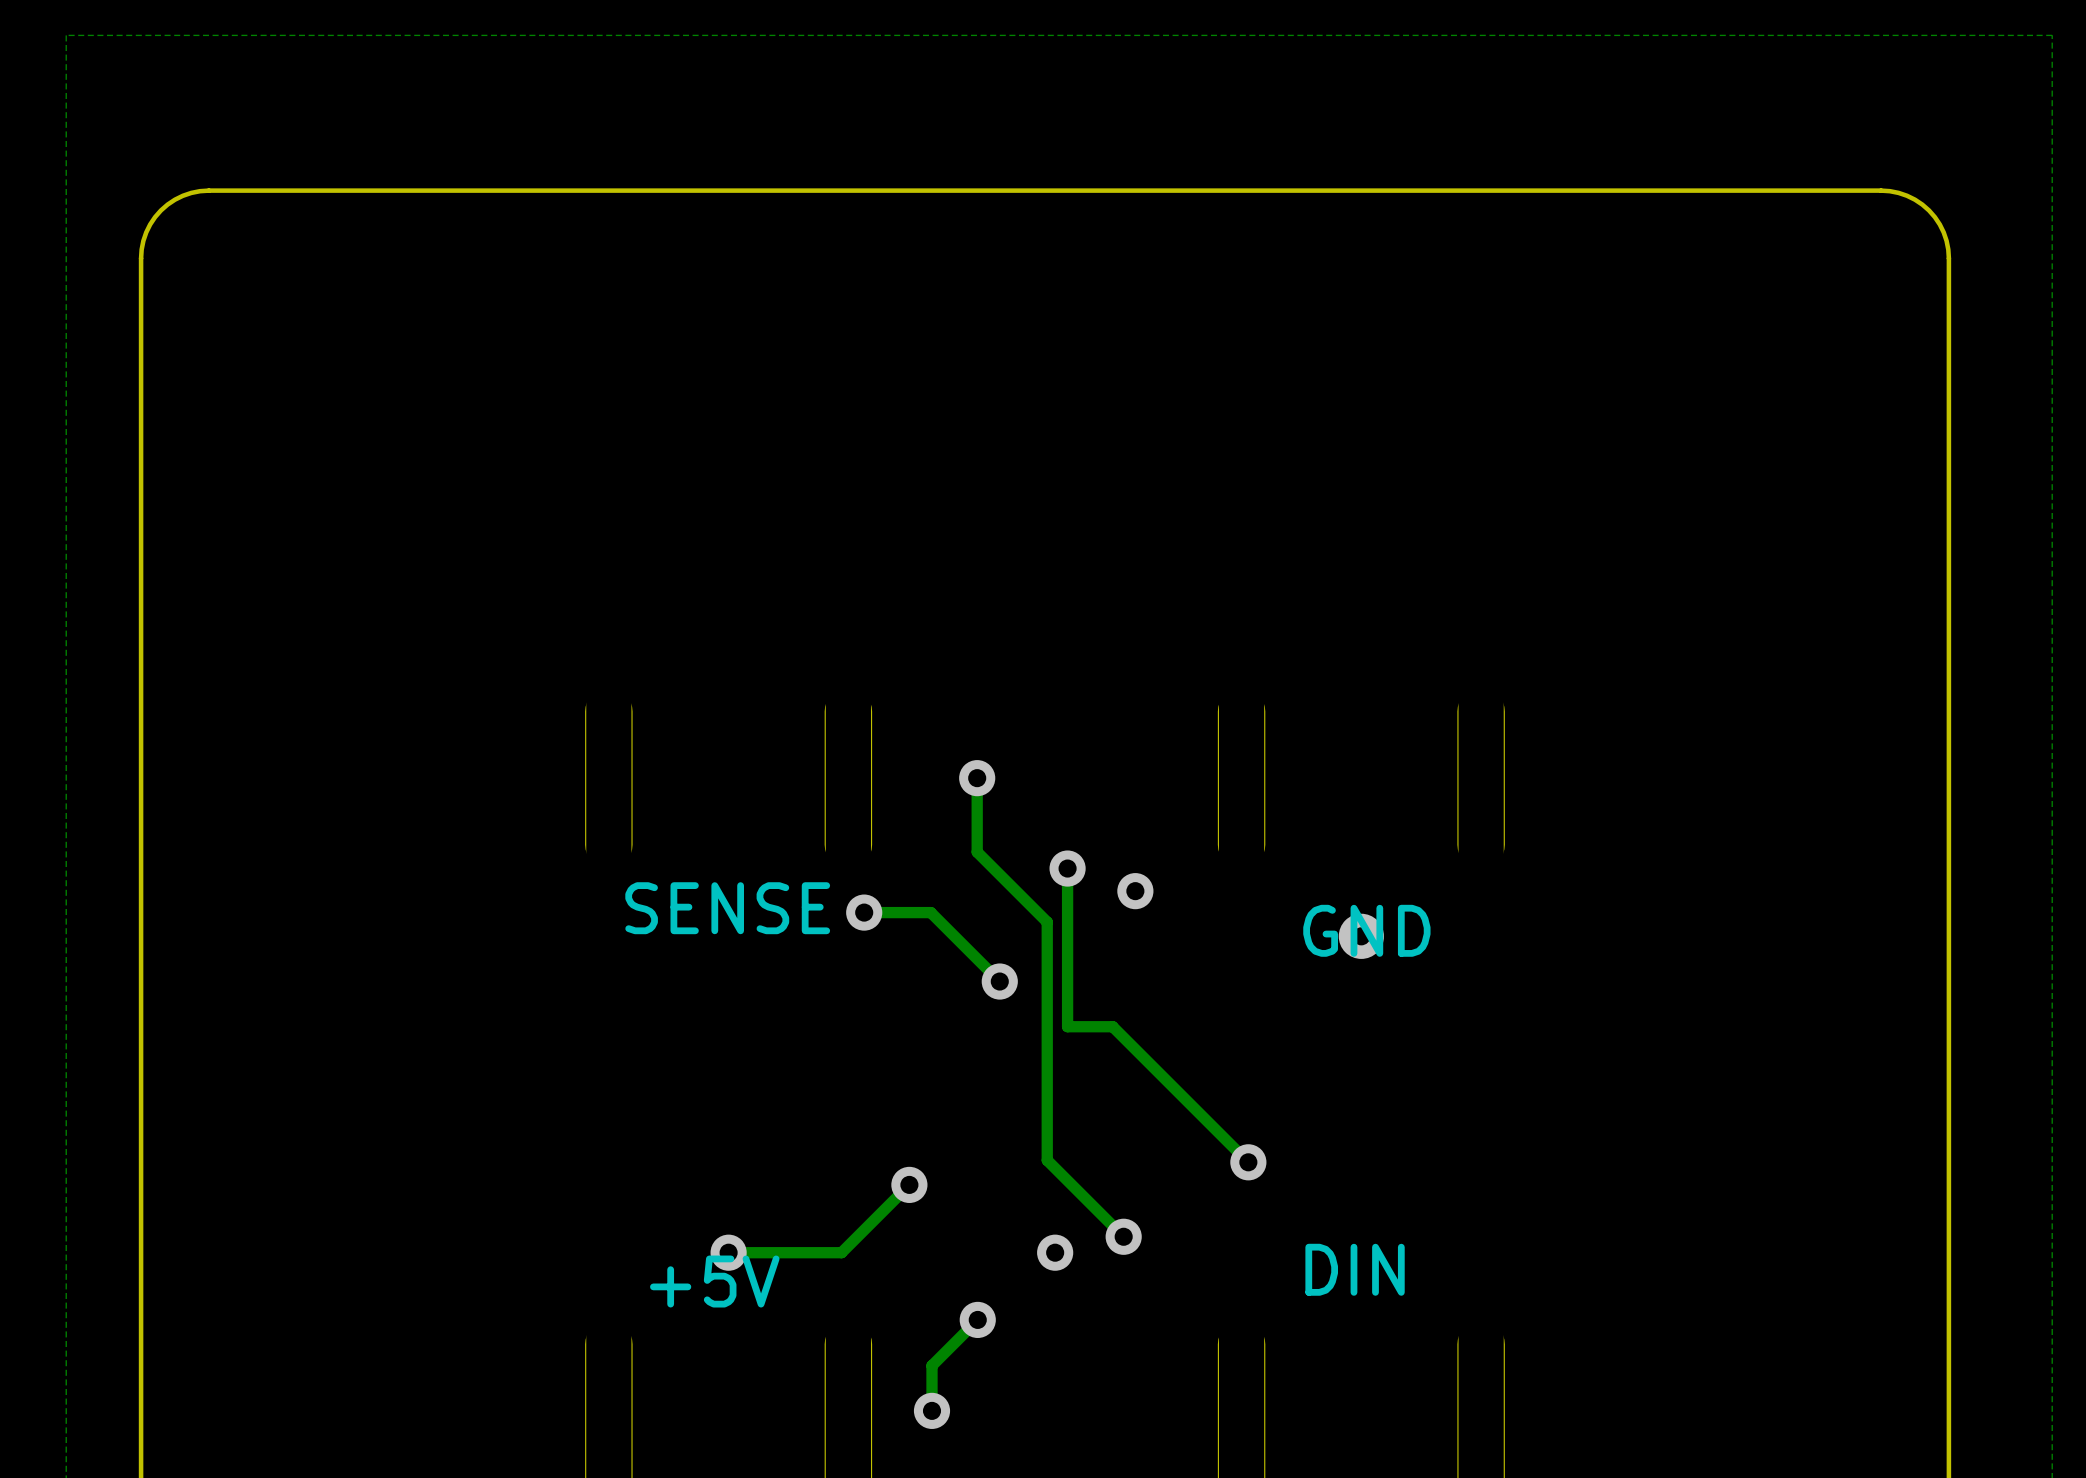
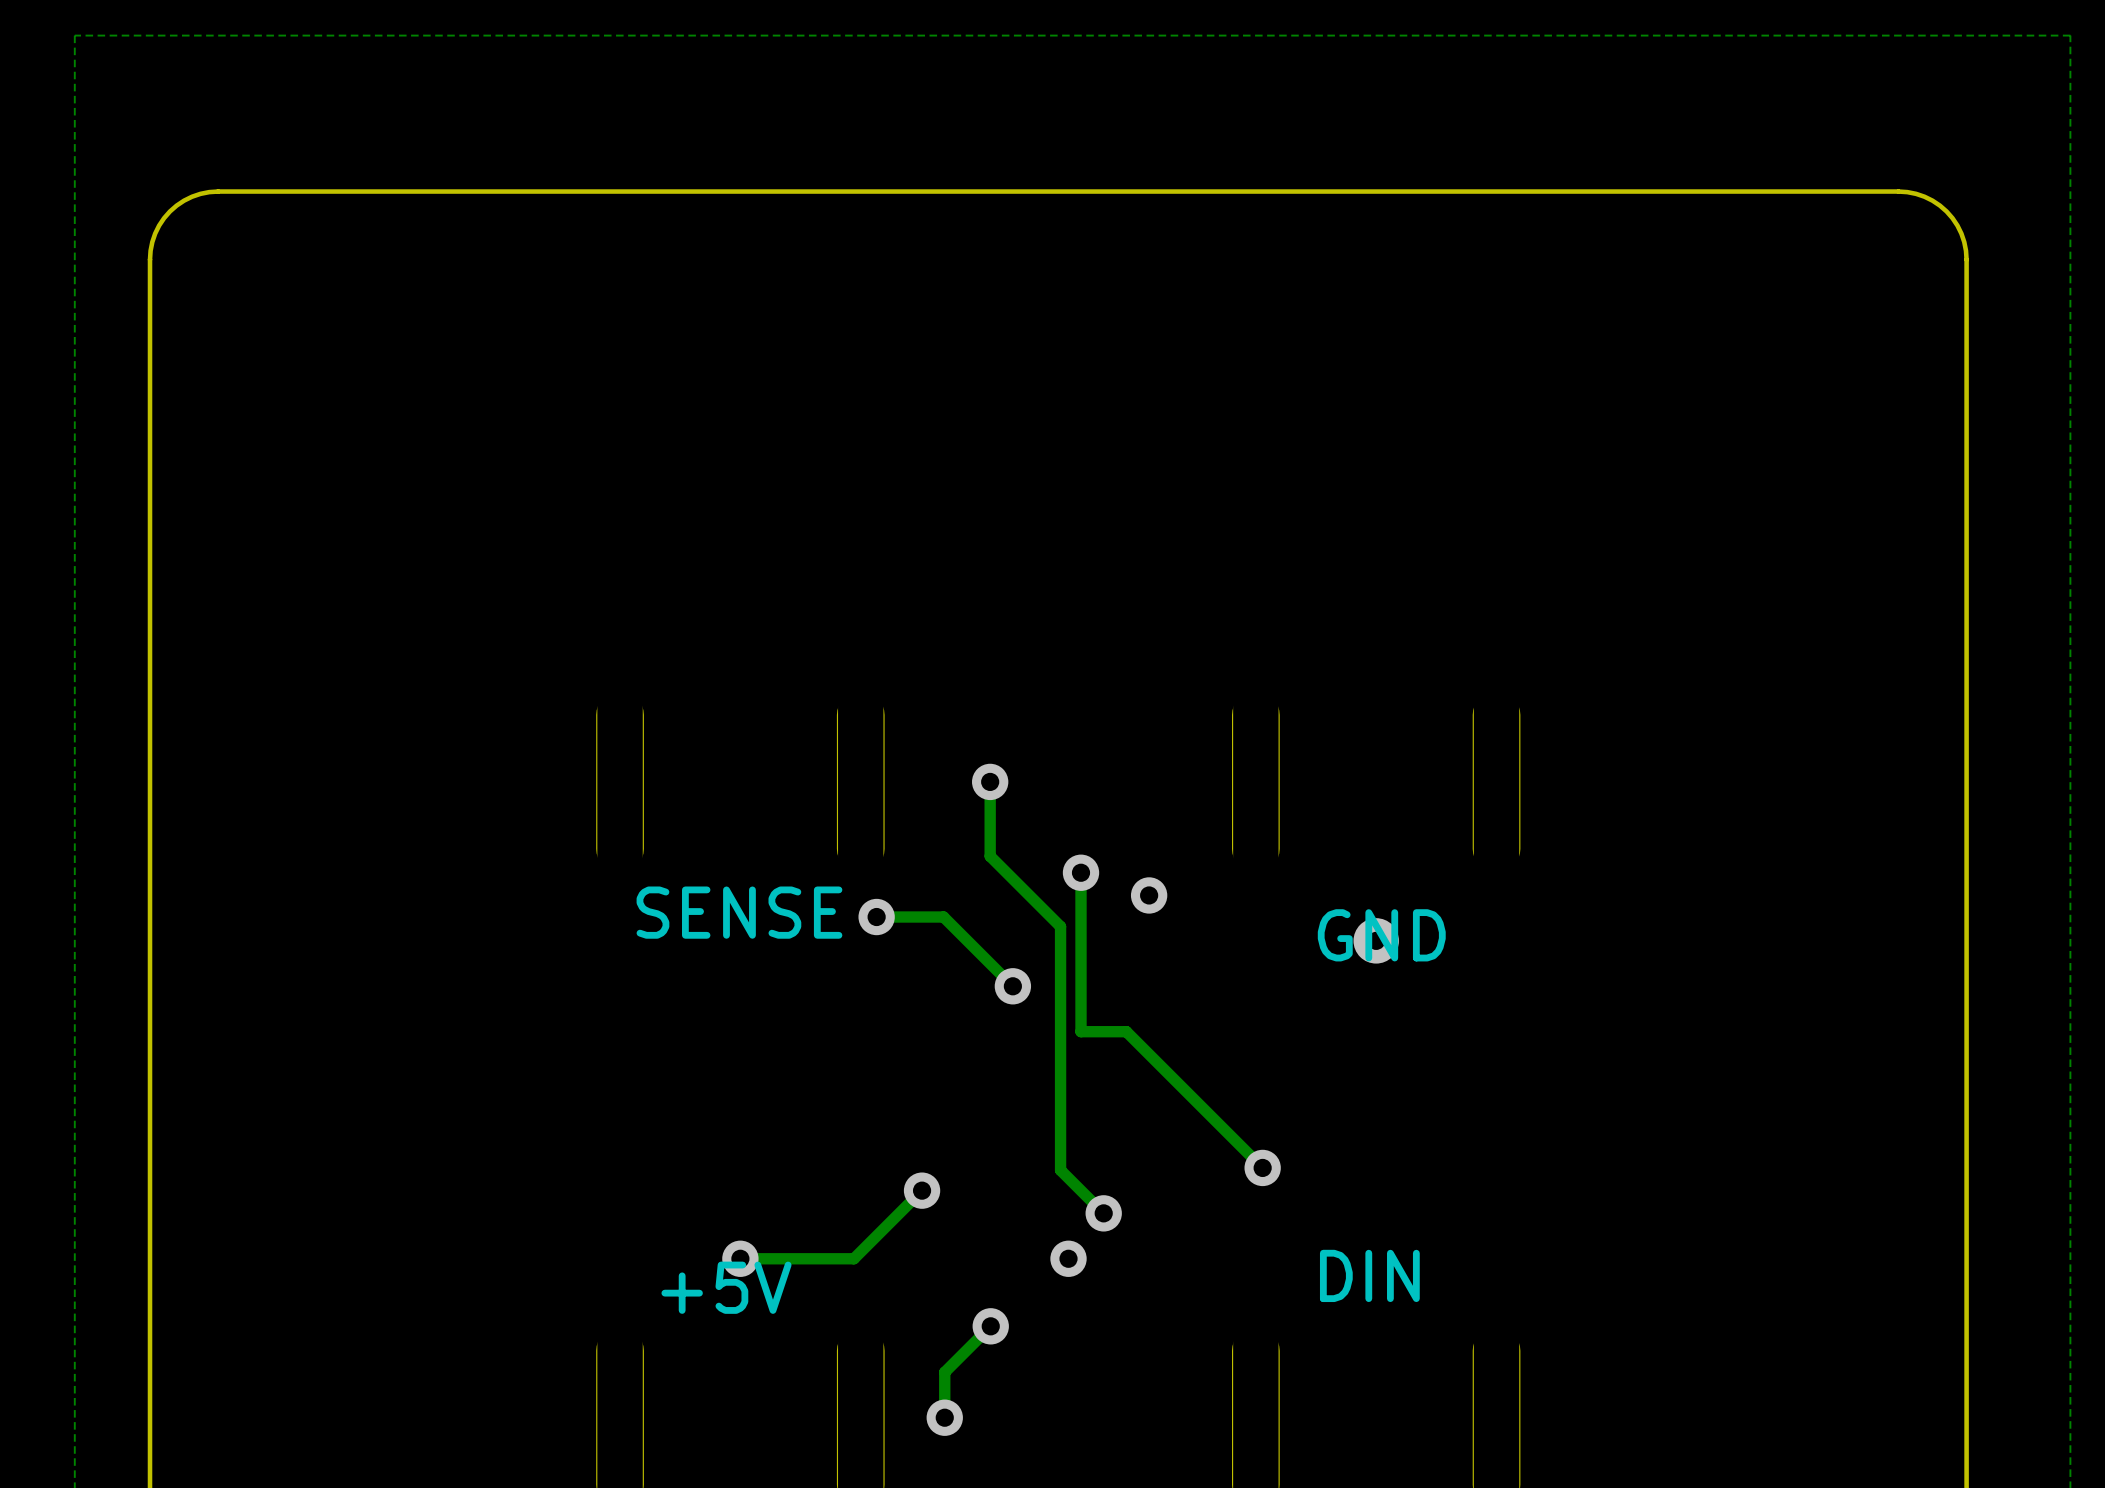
track: (1047, 1160) (1123, 1236) -> (1060, 1165) (1060, 1170) (1103, 1213)
via position: (1123, 1236) -> (1103, 1213)

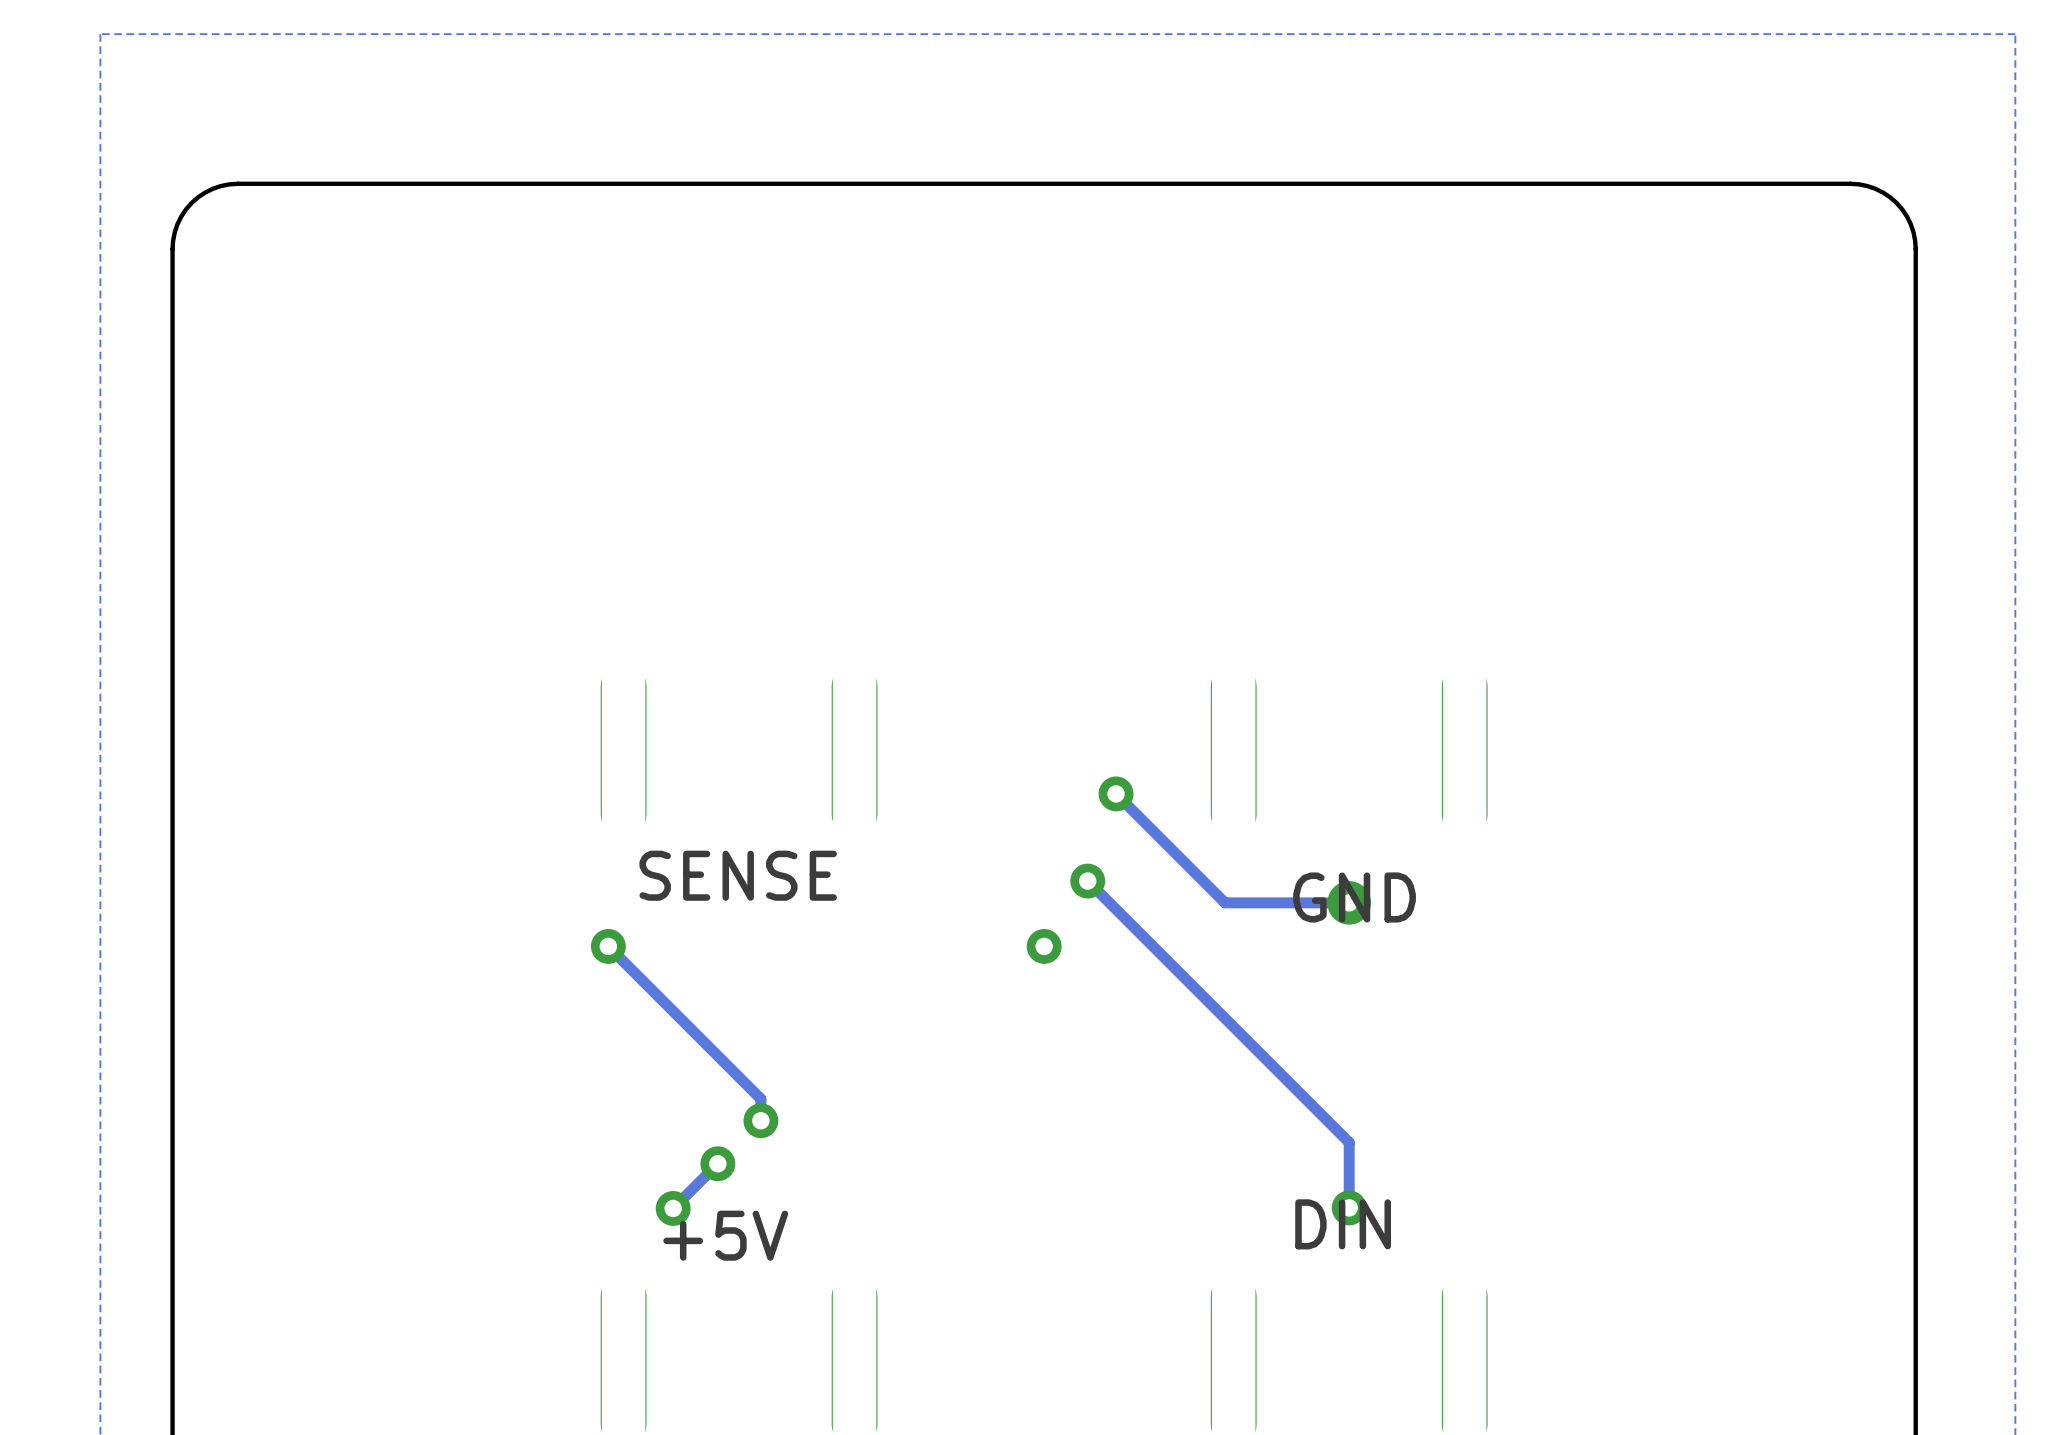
track: (990, 781) (990, 856) (1060, 926) (1060, 1170) (1103, 1213) -> none
via: (990, 781) -> none
track: none -> (1116, 793) (1224, 902) (1349, 902)
via: none -> (1116, 793)
track: (1081, 872) (1081, 1031) (1126, 1031) (1262, 1167) -> none
via: (1081, 872) -> none
via: (1149, 895) -> none
track: (876, 917) (943, 917) (1012, 986) -> none
via: (876, 917) -> none
track: none -> (1087, 881) (1349, 1142) (1349, 1207)
via: none -> (1087, 881)
track: none -> (608, 946) (760, 1098) (760, 1120)
via: none -> (608, 946)
via position: (1012, 986) -> (1044, 946)
via: none -> (760, 1120)
via: (1262, 1167) -> none
track: (922, 1190) (853, 1258) (740, 1258) -> none
via: (922, 1190) -> none
track: none -> (717, 1163) (673, 1208)
via: none -> (717, 1163)
via: (1103, 1213) -> none
via: (740, 1258) -> none
via: (1068, 1258) -> none
via: none -> (1349, 1207)
via: none -> (673, 1208)
track: (990, 1326) (944, 1372) (944, 1417) -> none
via: (990, 1326) -> none
via: (944, 1417) -> none

